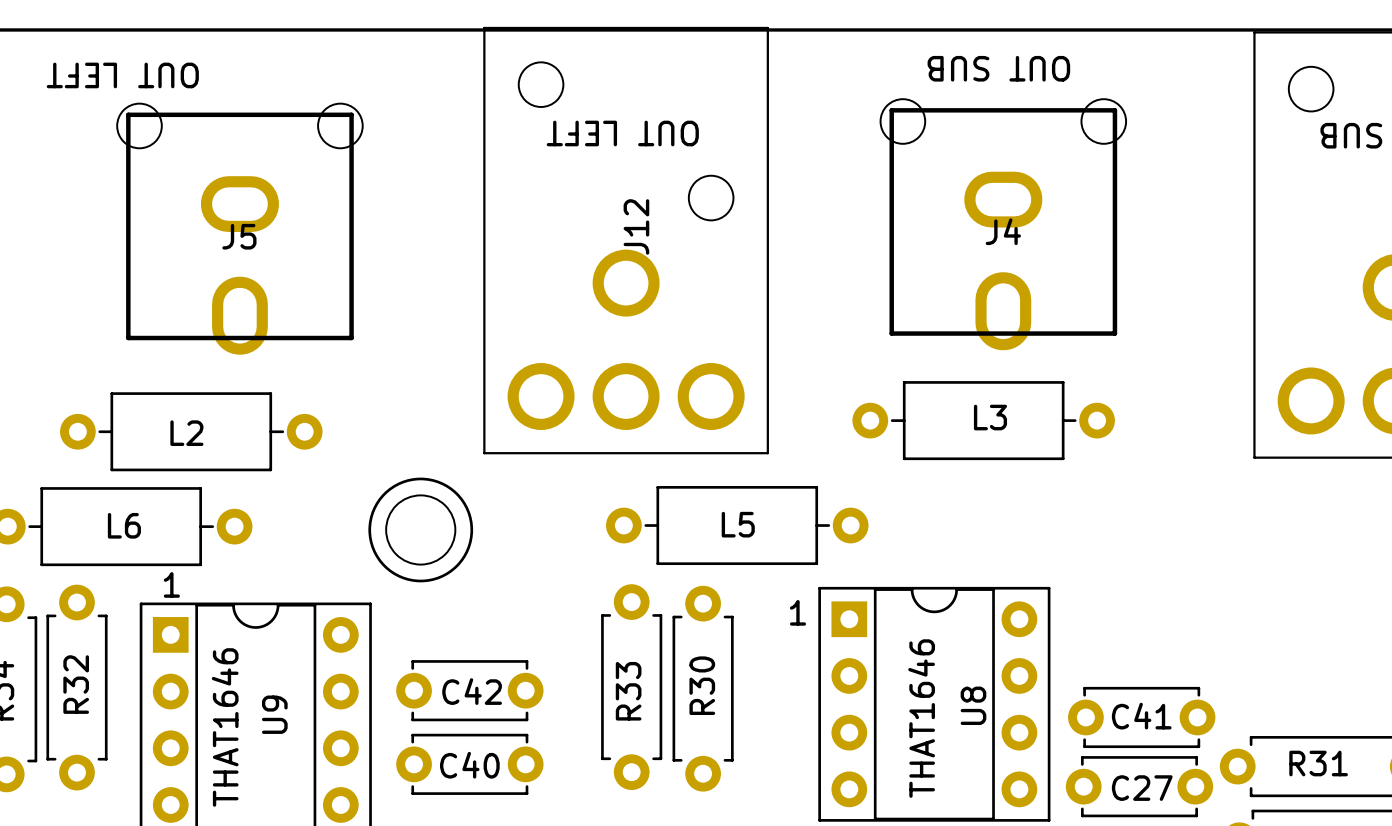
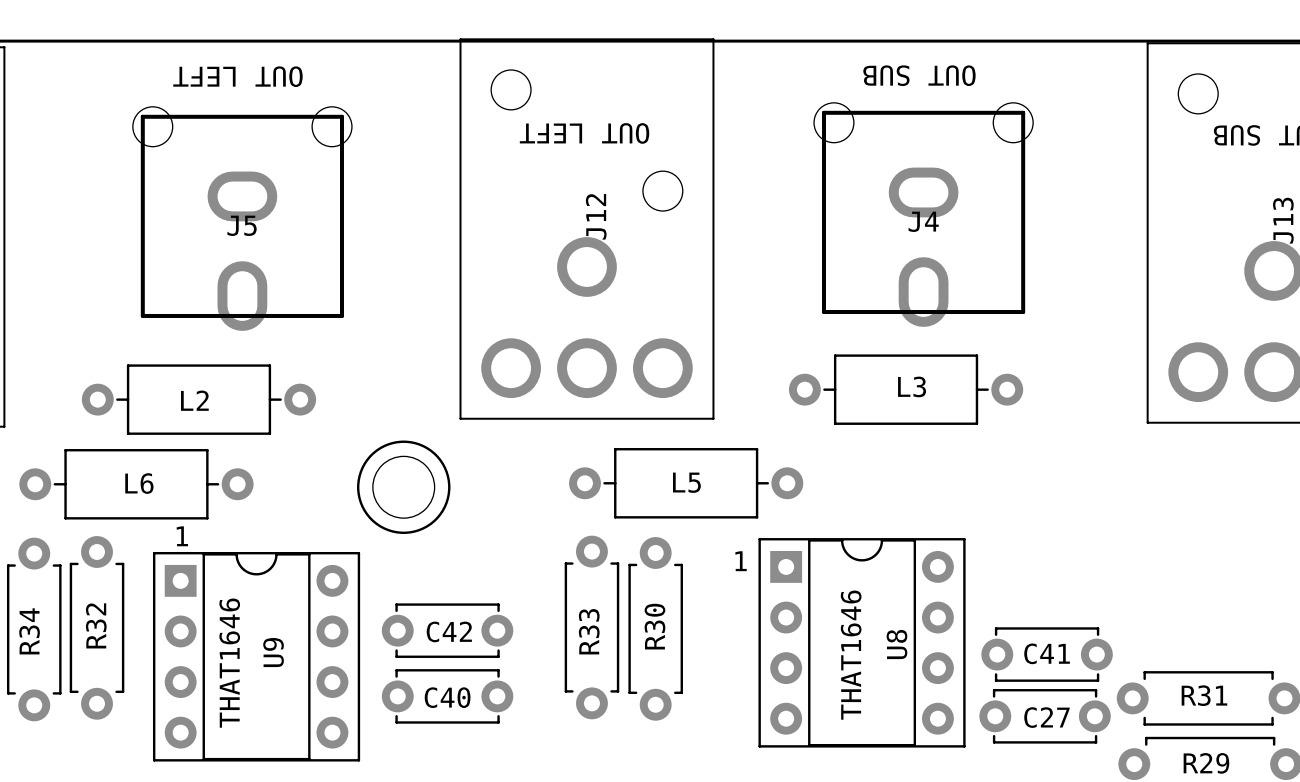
text position: OUT LEFT (122, 75) -> OUT LEFT (237, 76)

